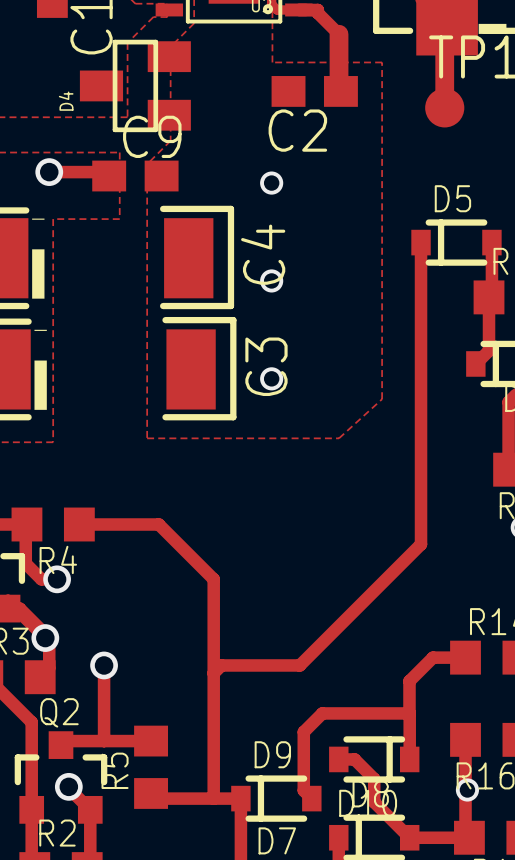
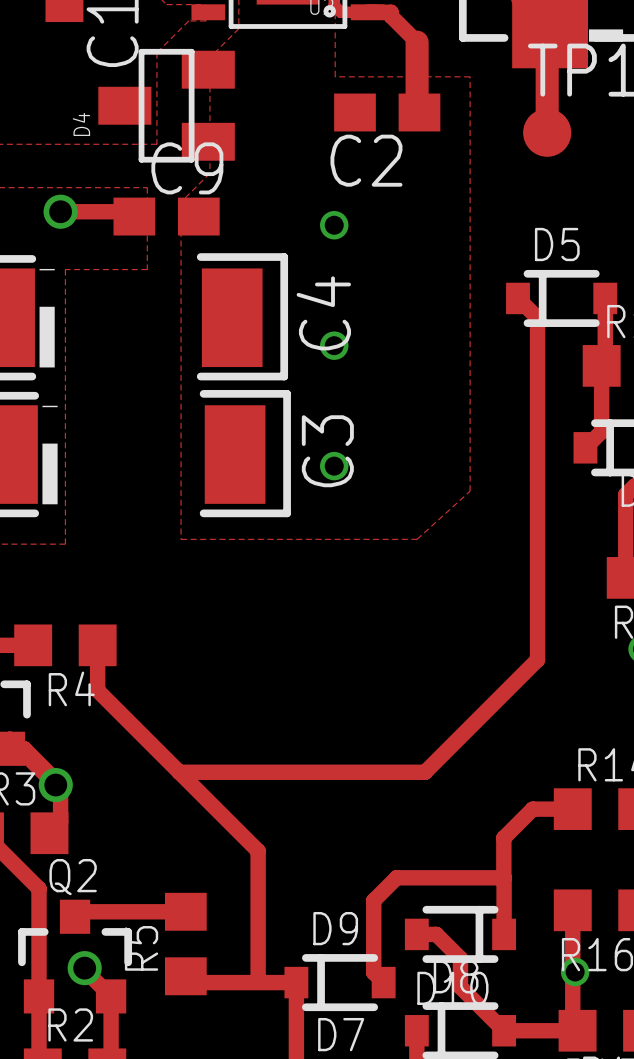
track: (421, 242) (421, 544) (299, 665) (221, 665) (213, 673) -> (518, 298) (537, 318) (537, 659) (425, 772) (179, 772)
track: (26, 524) (25, 563) (41, 579) (57, 579) -> none
track: (79, 524) (158, 524) (213, 579) (213, 798) -> (97, 645) (97, 690) (258, 851) (258, 976)
via: (57, 579) -> none
track: (104, 665) (104, 741) -> none
via: (104, 665) -> none

